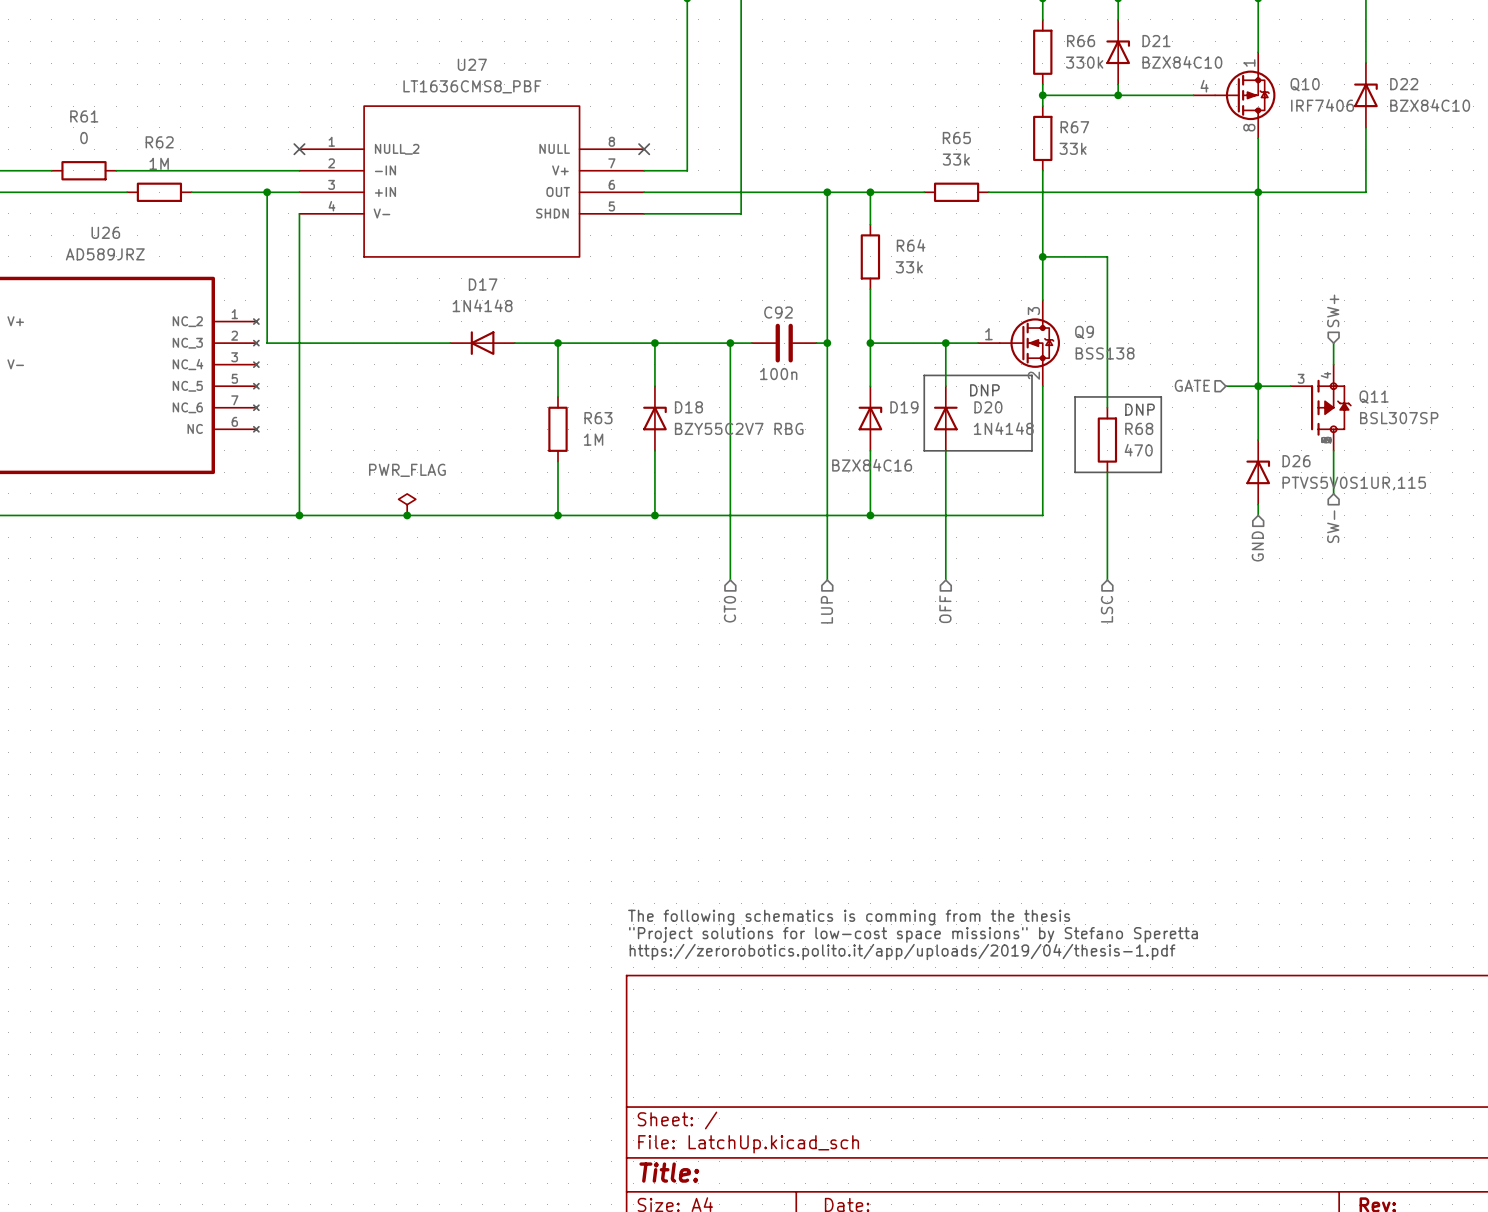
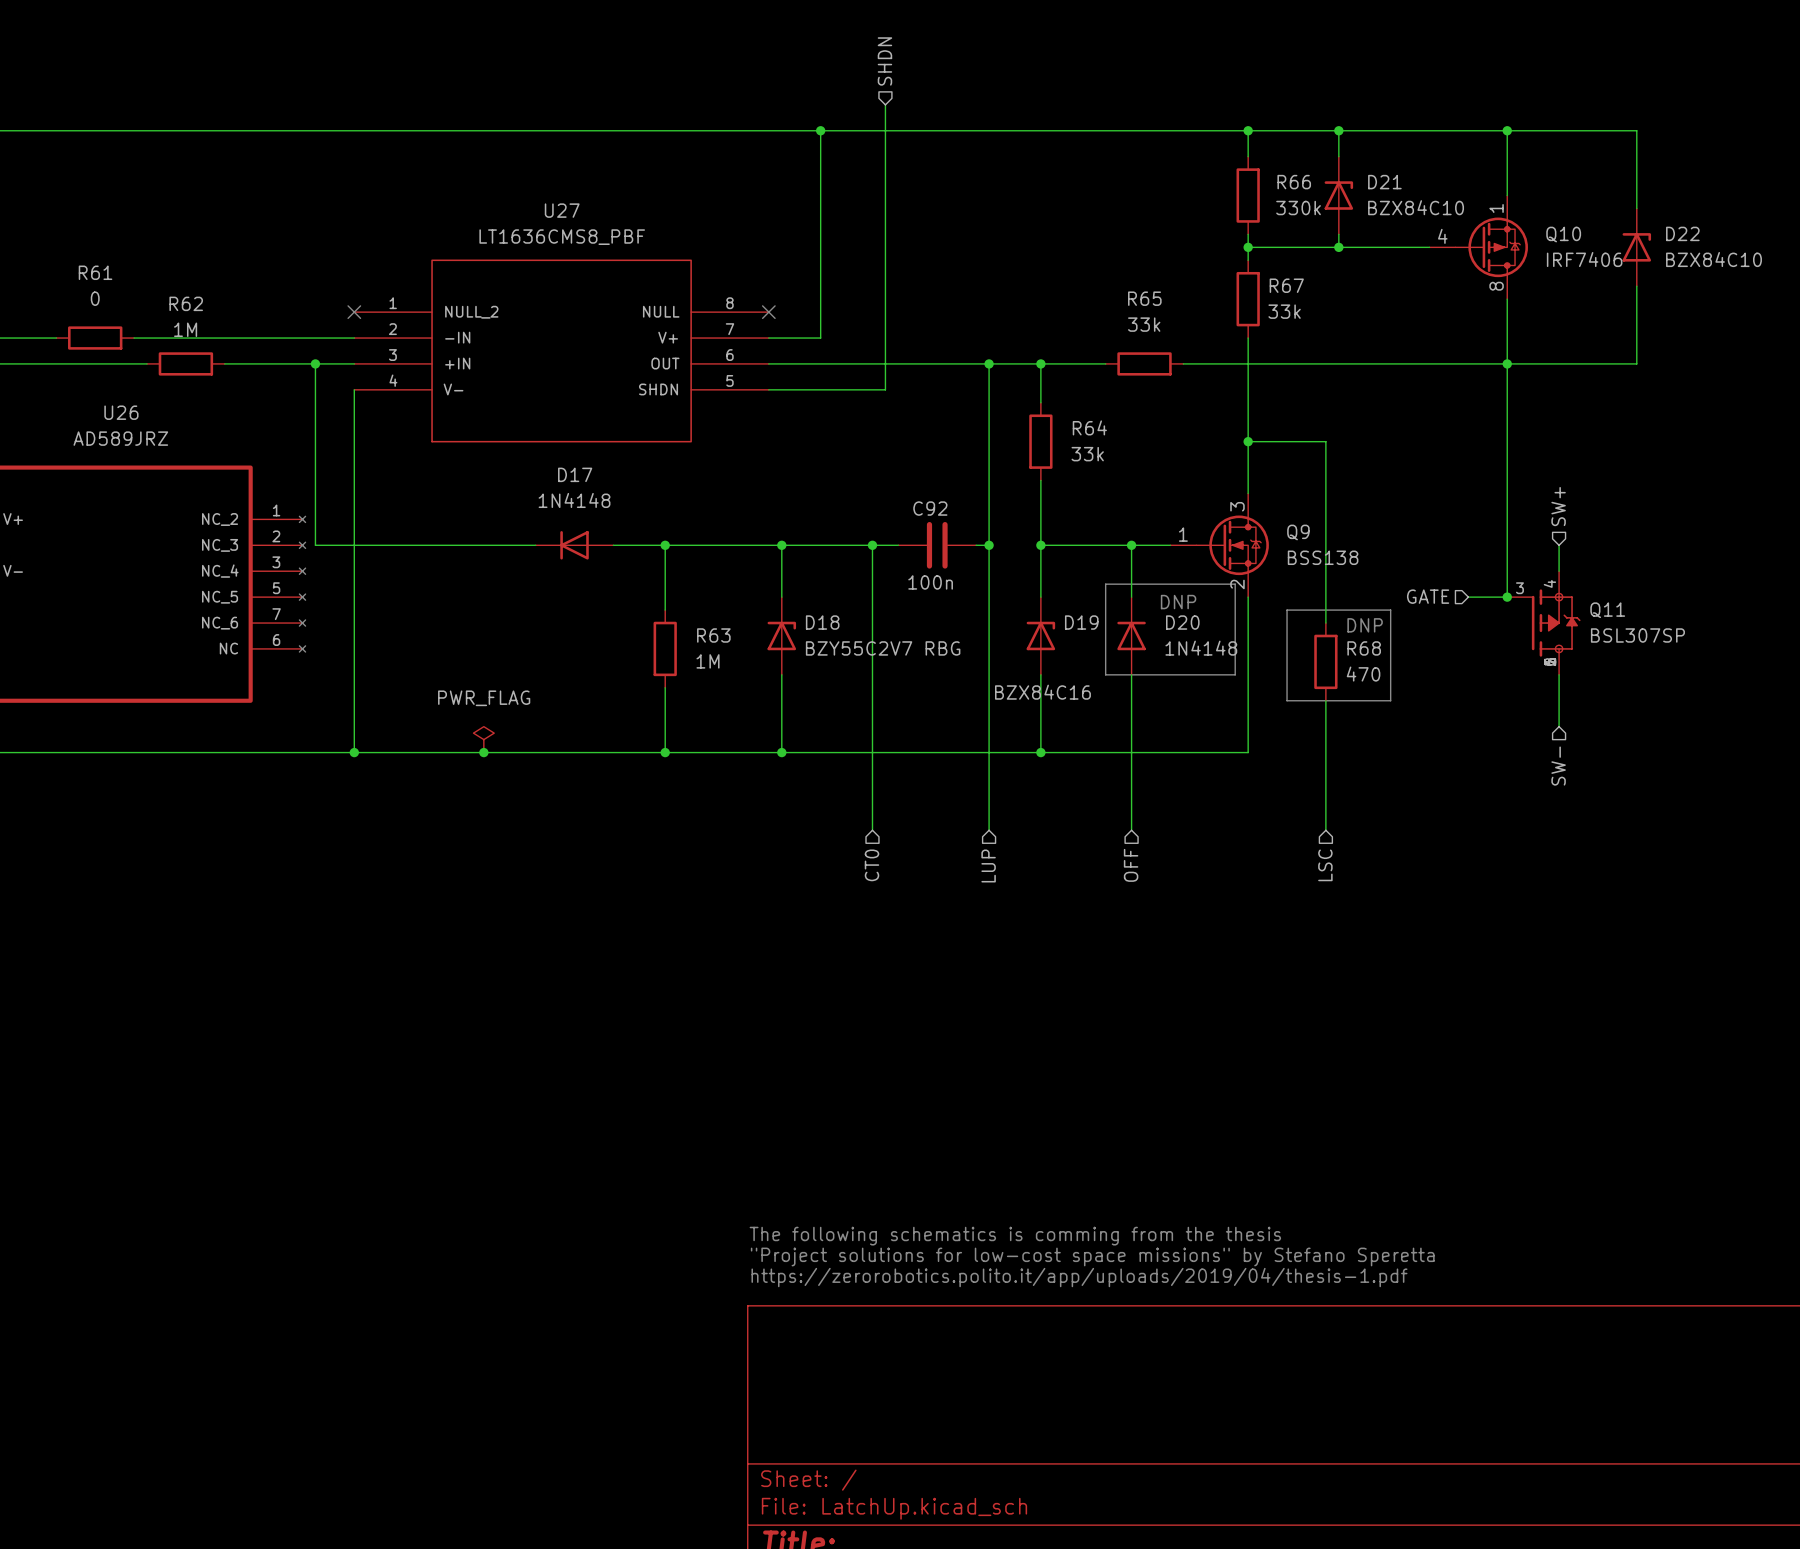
hierarchical label position: SW+ (1333, 310) -> SW+ (1558, 506)
wire: (1333, 343) (1333, 364) -> (1559, 545) (1559, 571)
wire: (1290, 386) (1258, 386) (1258, 440) -> none
Q11 position: (1321, 407) -> (1543, 623)
wire: (1333, 450) (1333, 493) -> (1559, 674) (1559, 726)
D26: PTVS5V0S1UR,115 (1258, 472) -> none
wire: (1258, 504) (1258, 515) -> none
hierarchical label position: SW- (1333, 526) -> SW- (1558, 766)
hierarchical label: GND (1257, 546) -> none

